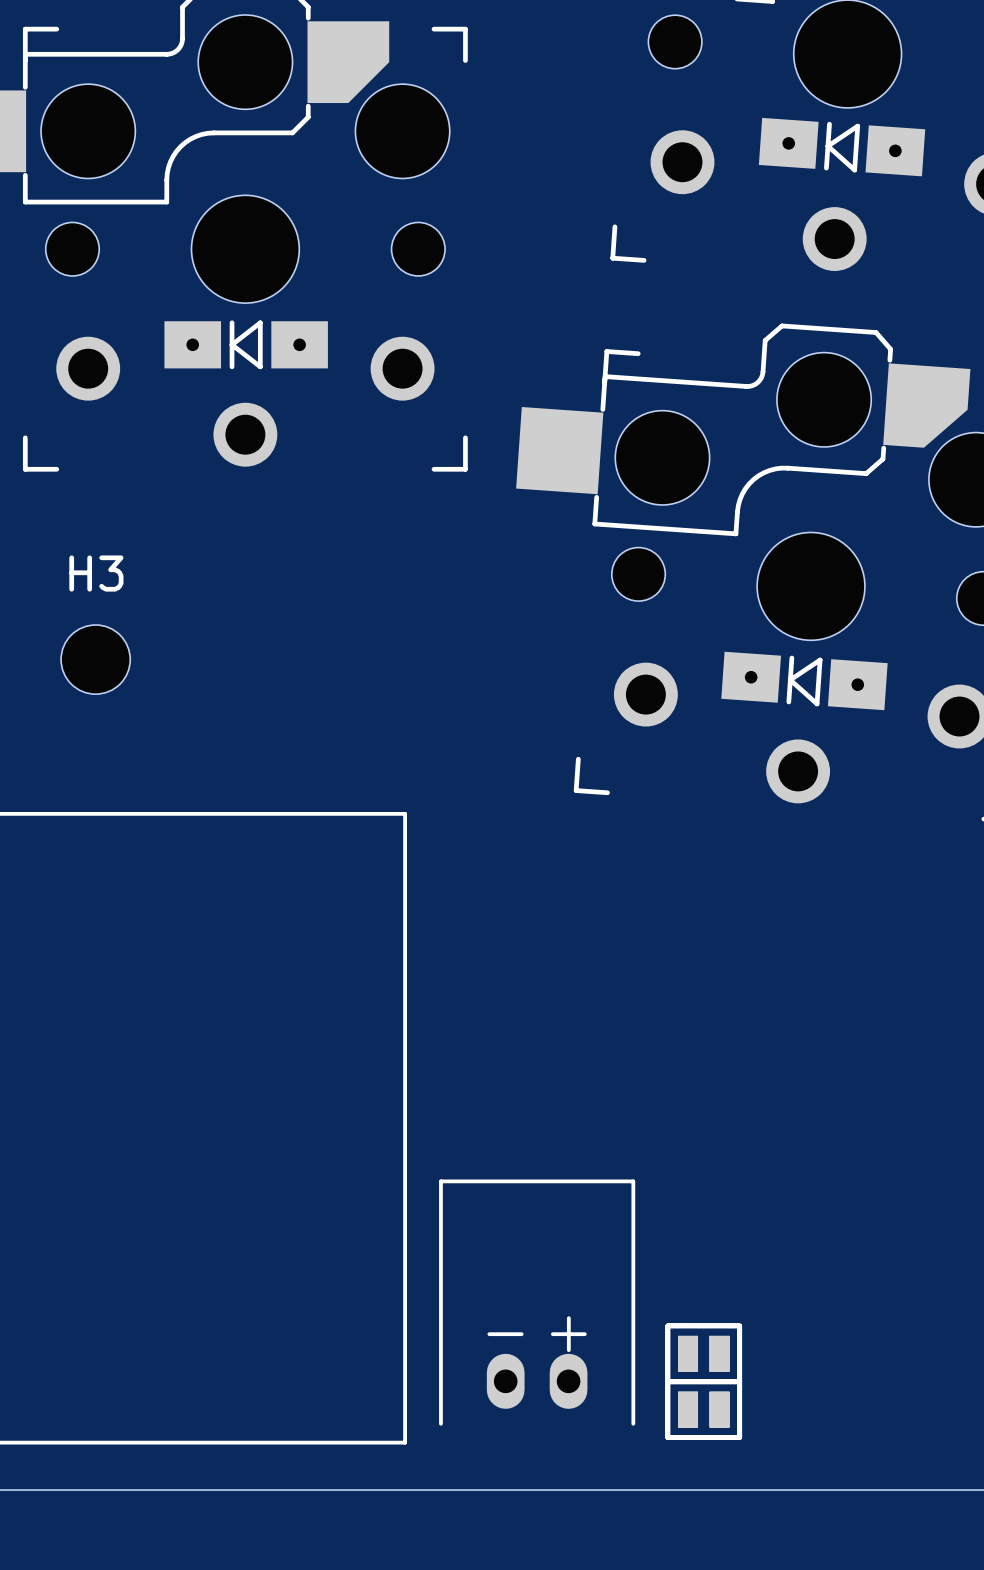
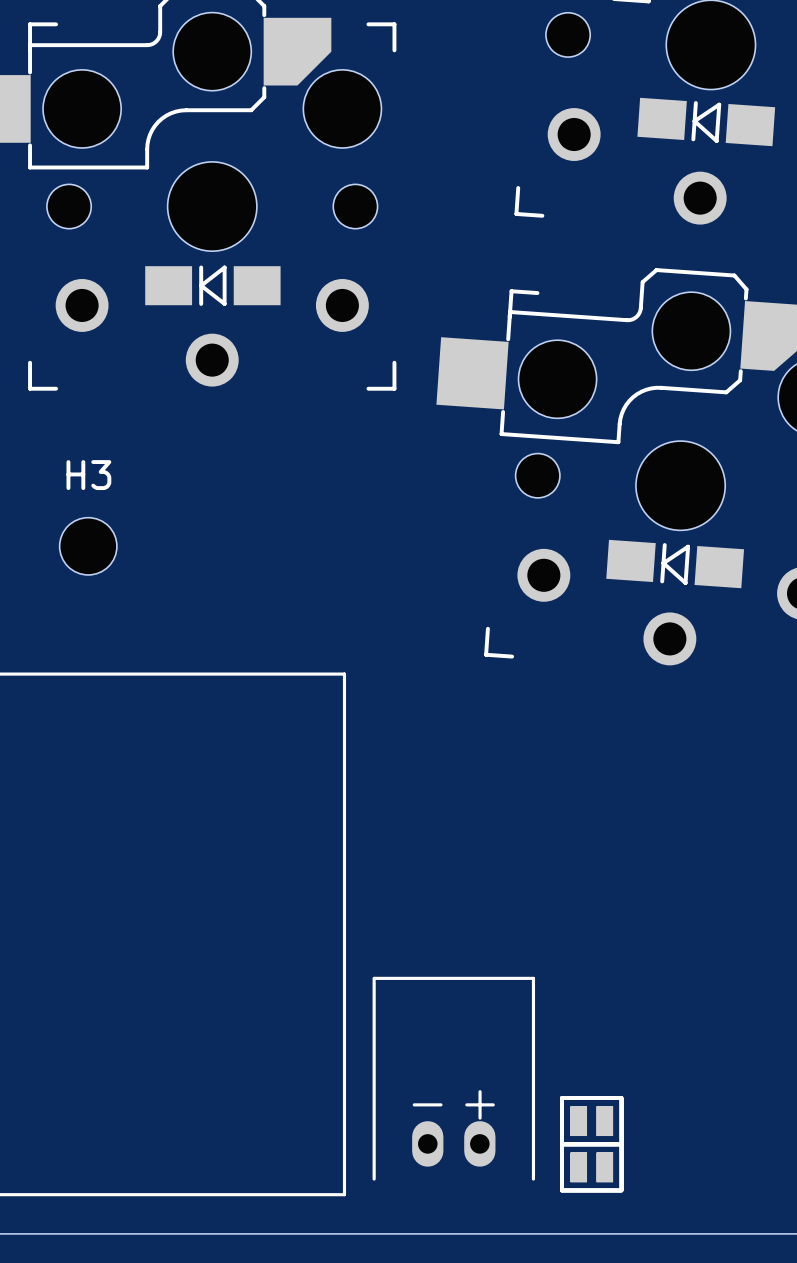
part footprint: [758, 117, 926, 177] -> [637, 97, 776, 147]
part footprint: [164, 320, 328, 370] -> [145, 265, 281, 306]
part footprint: [721, 651, 888, 711] -> [606, 539, 745, 589]

